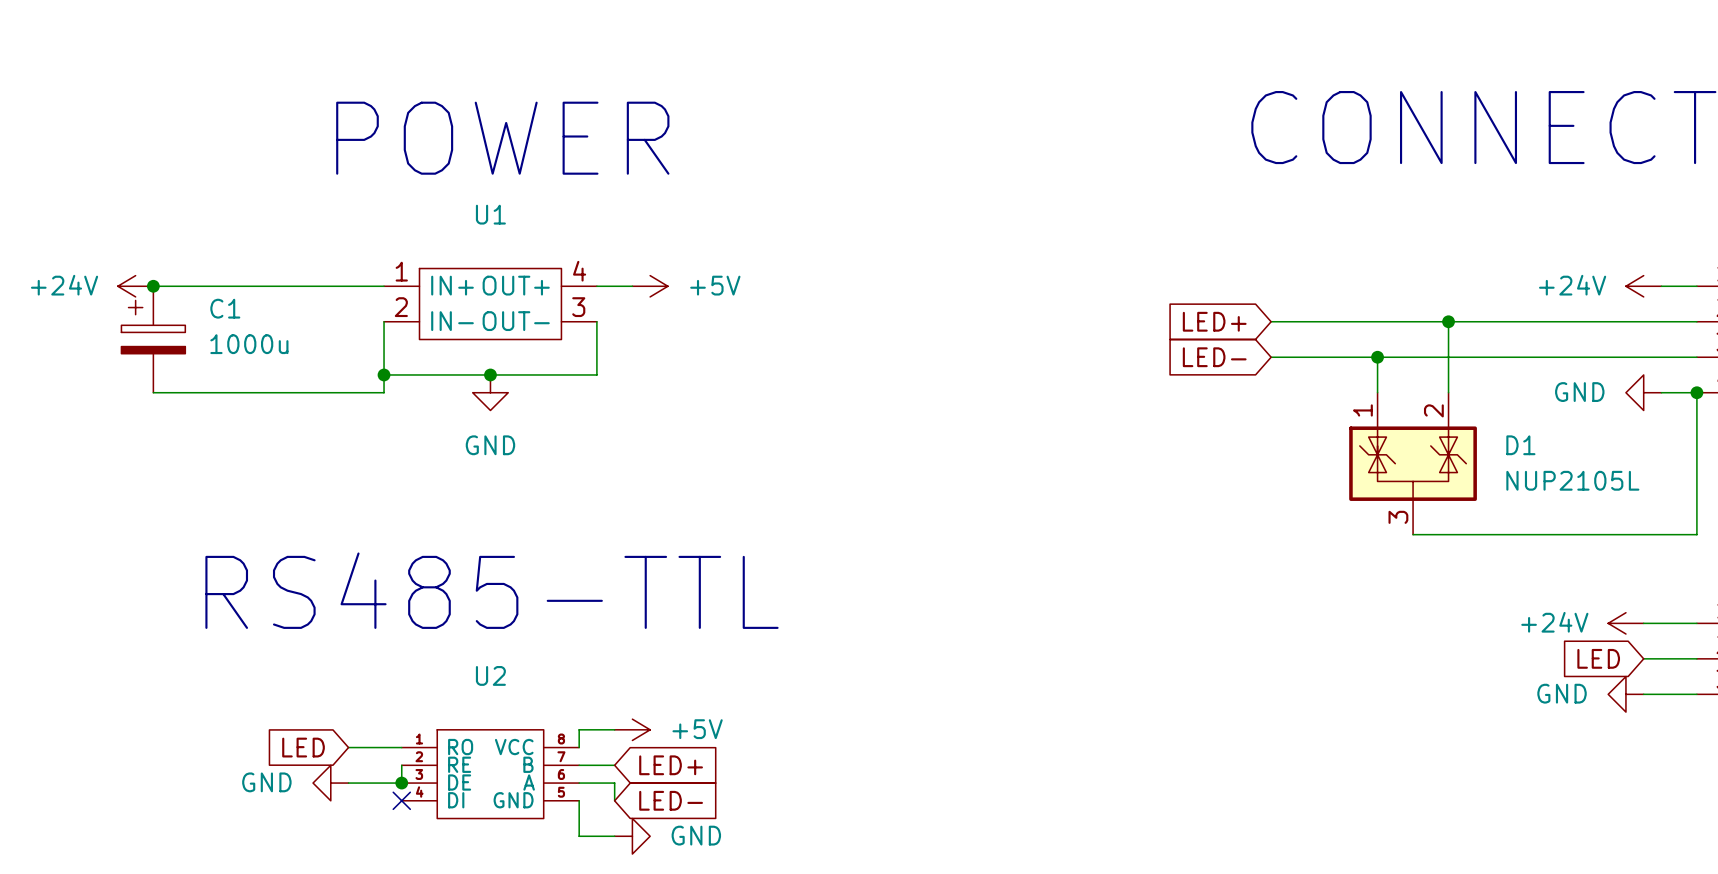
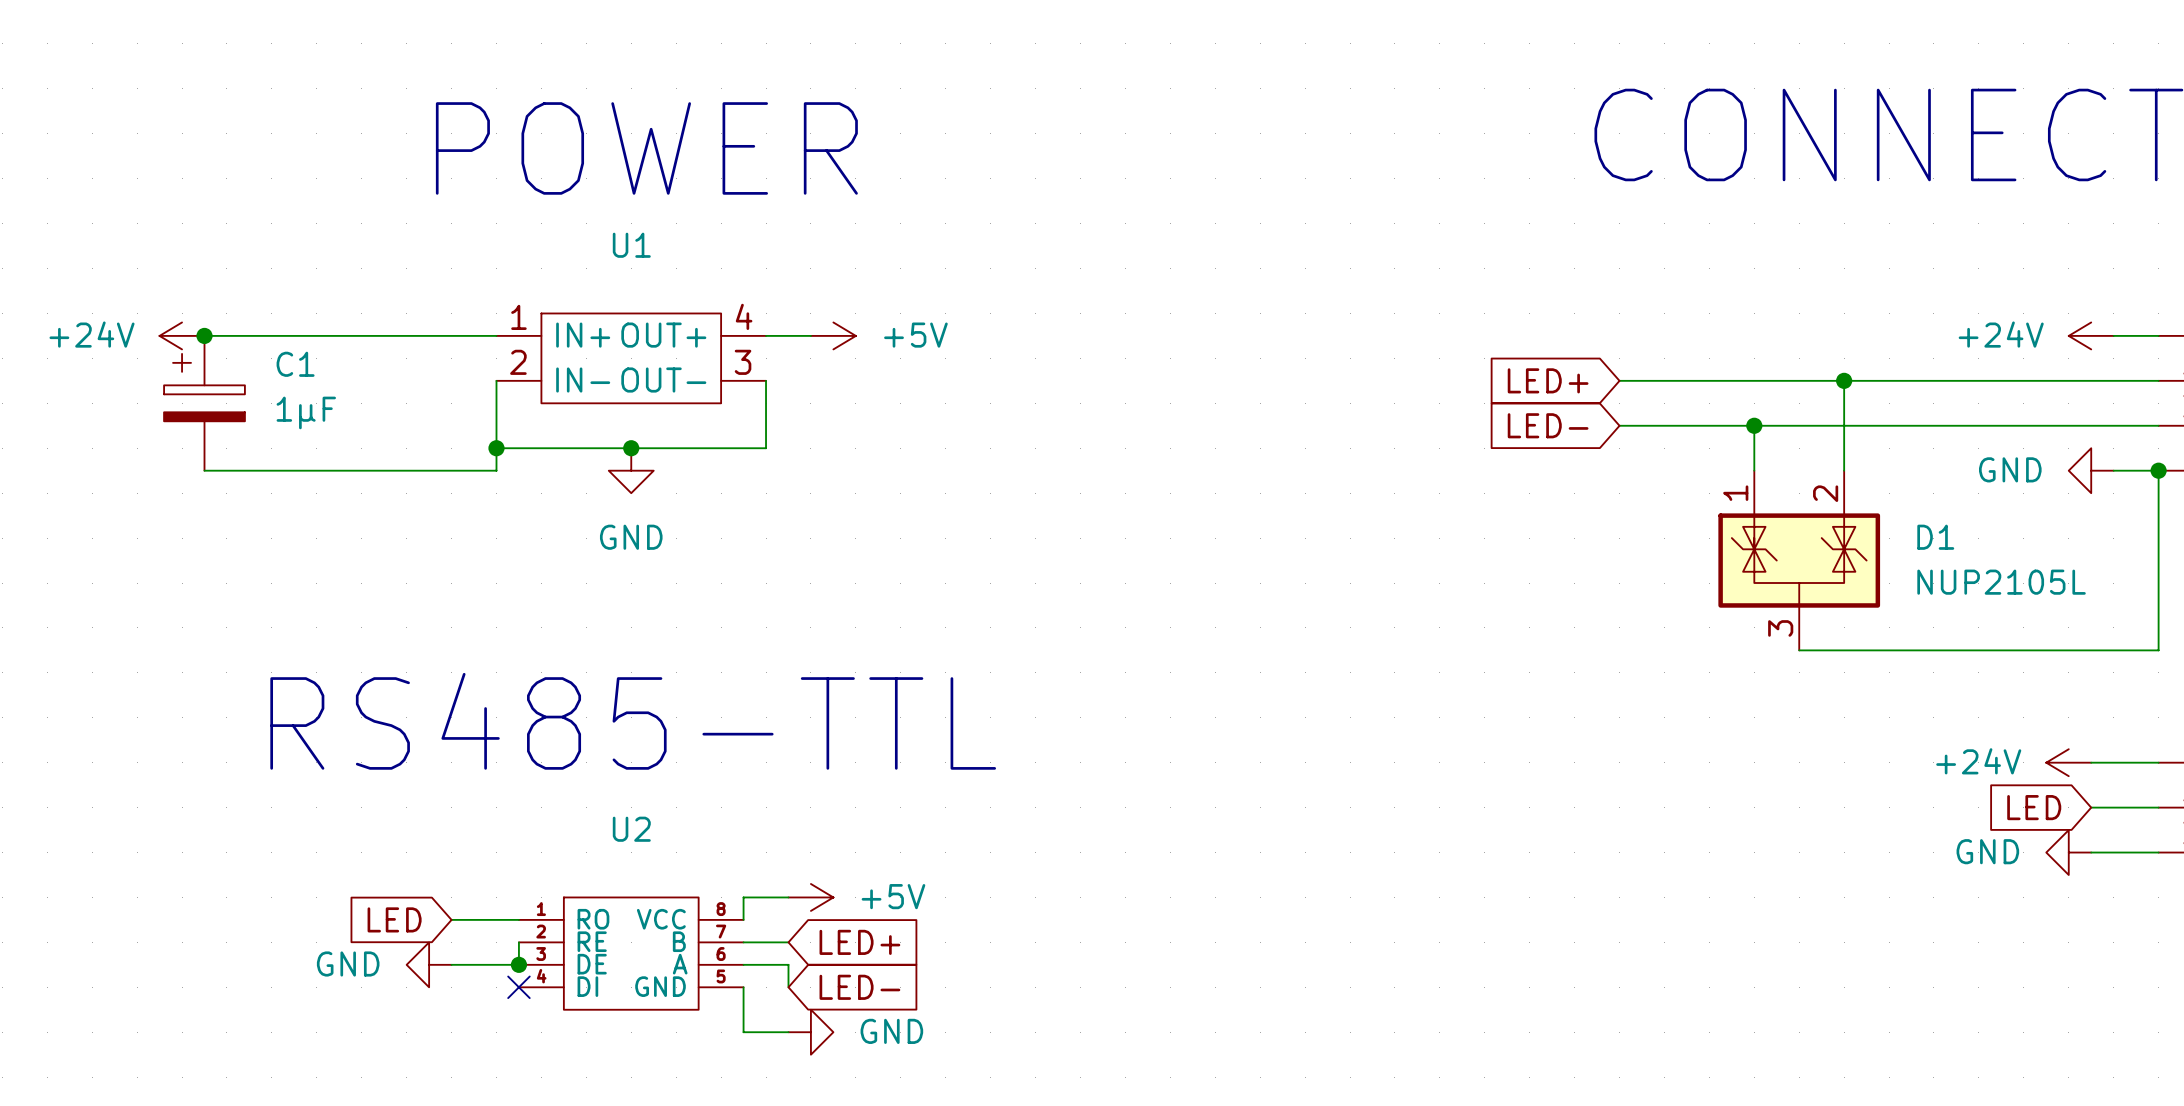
C1 value: 1000u (249, 344) -> 1μF (306, 412)

